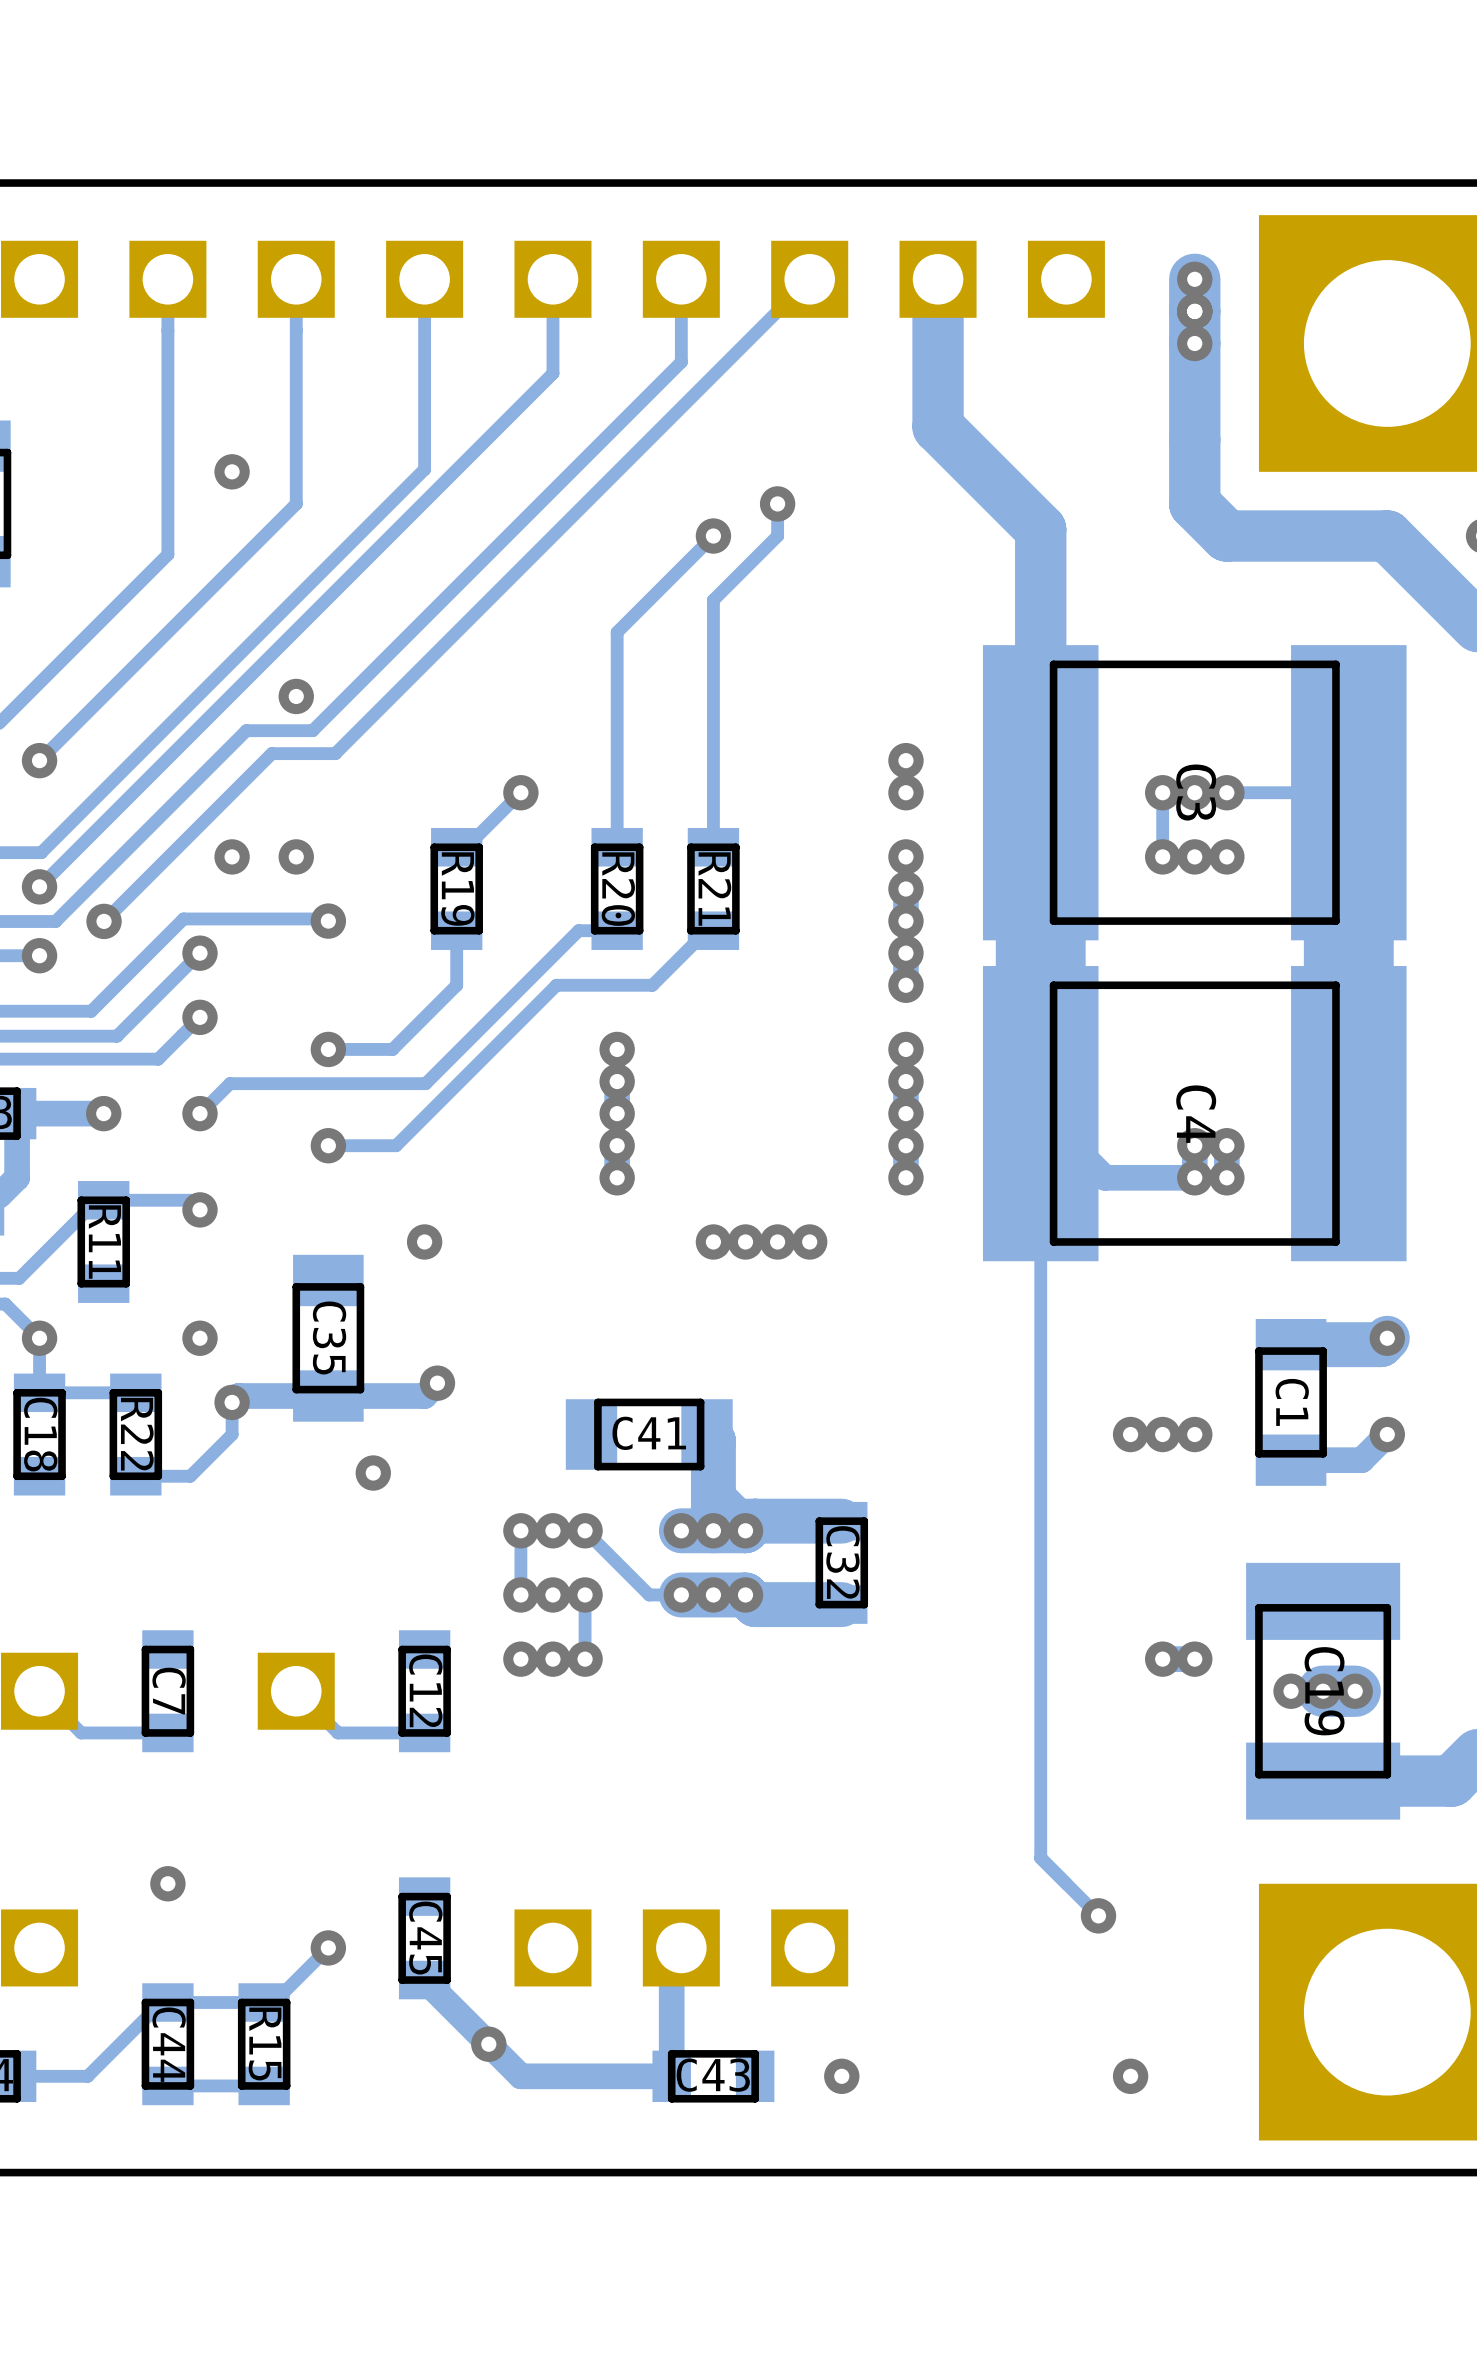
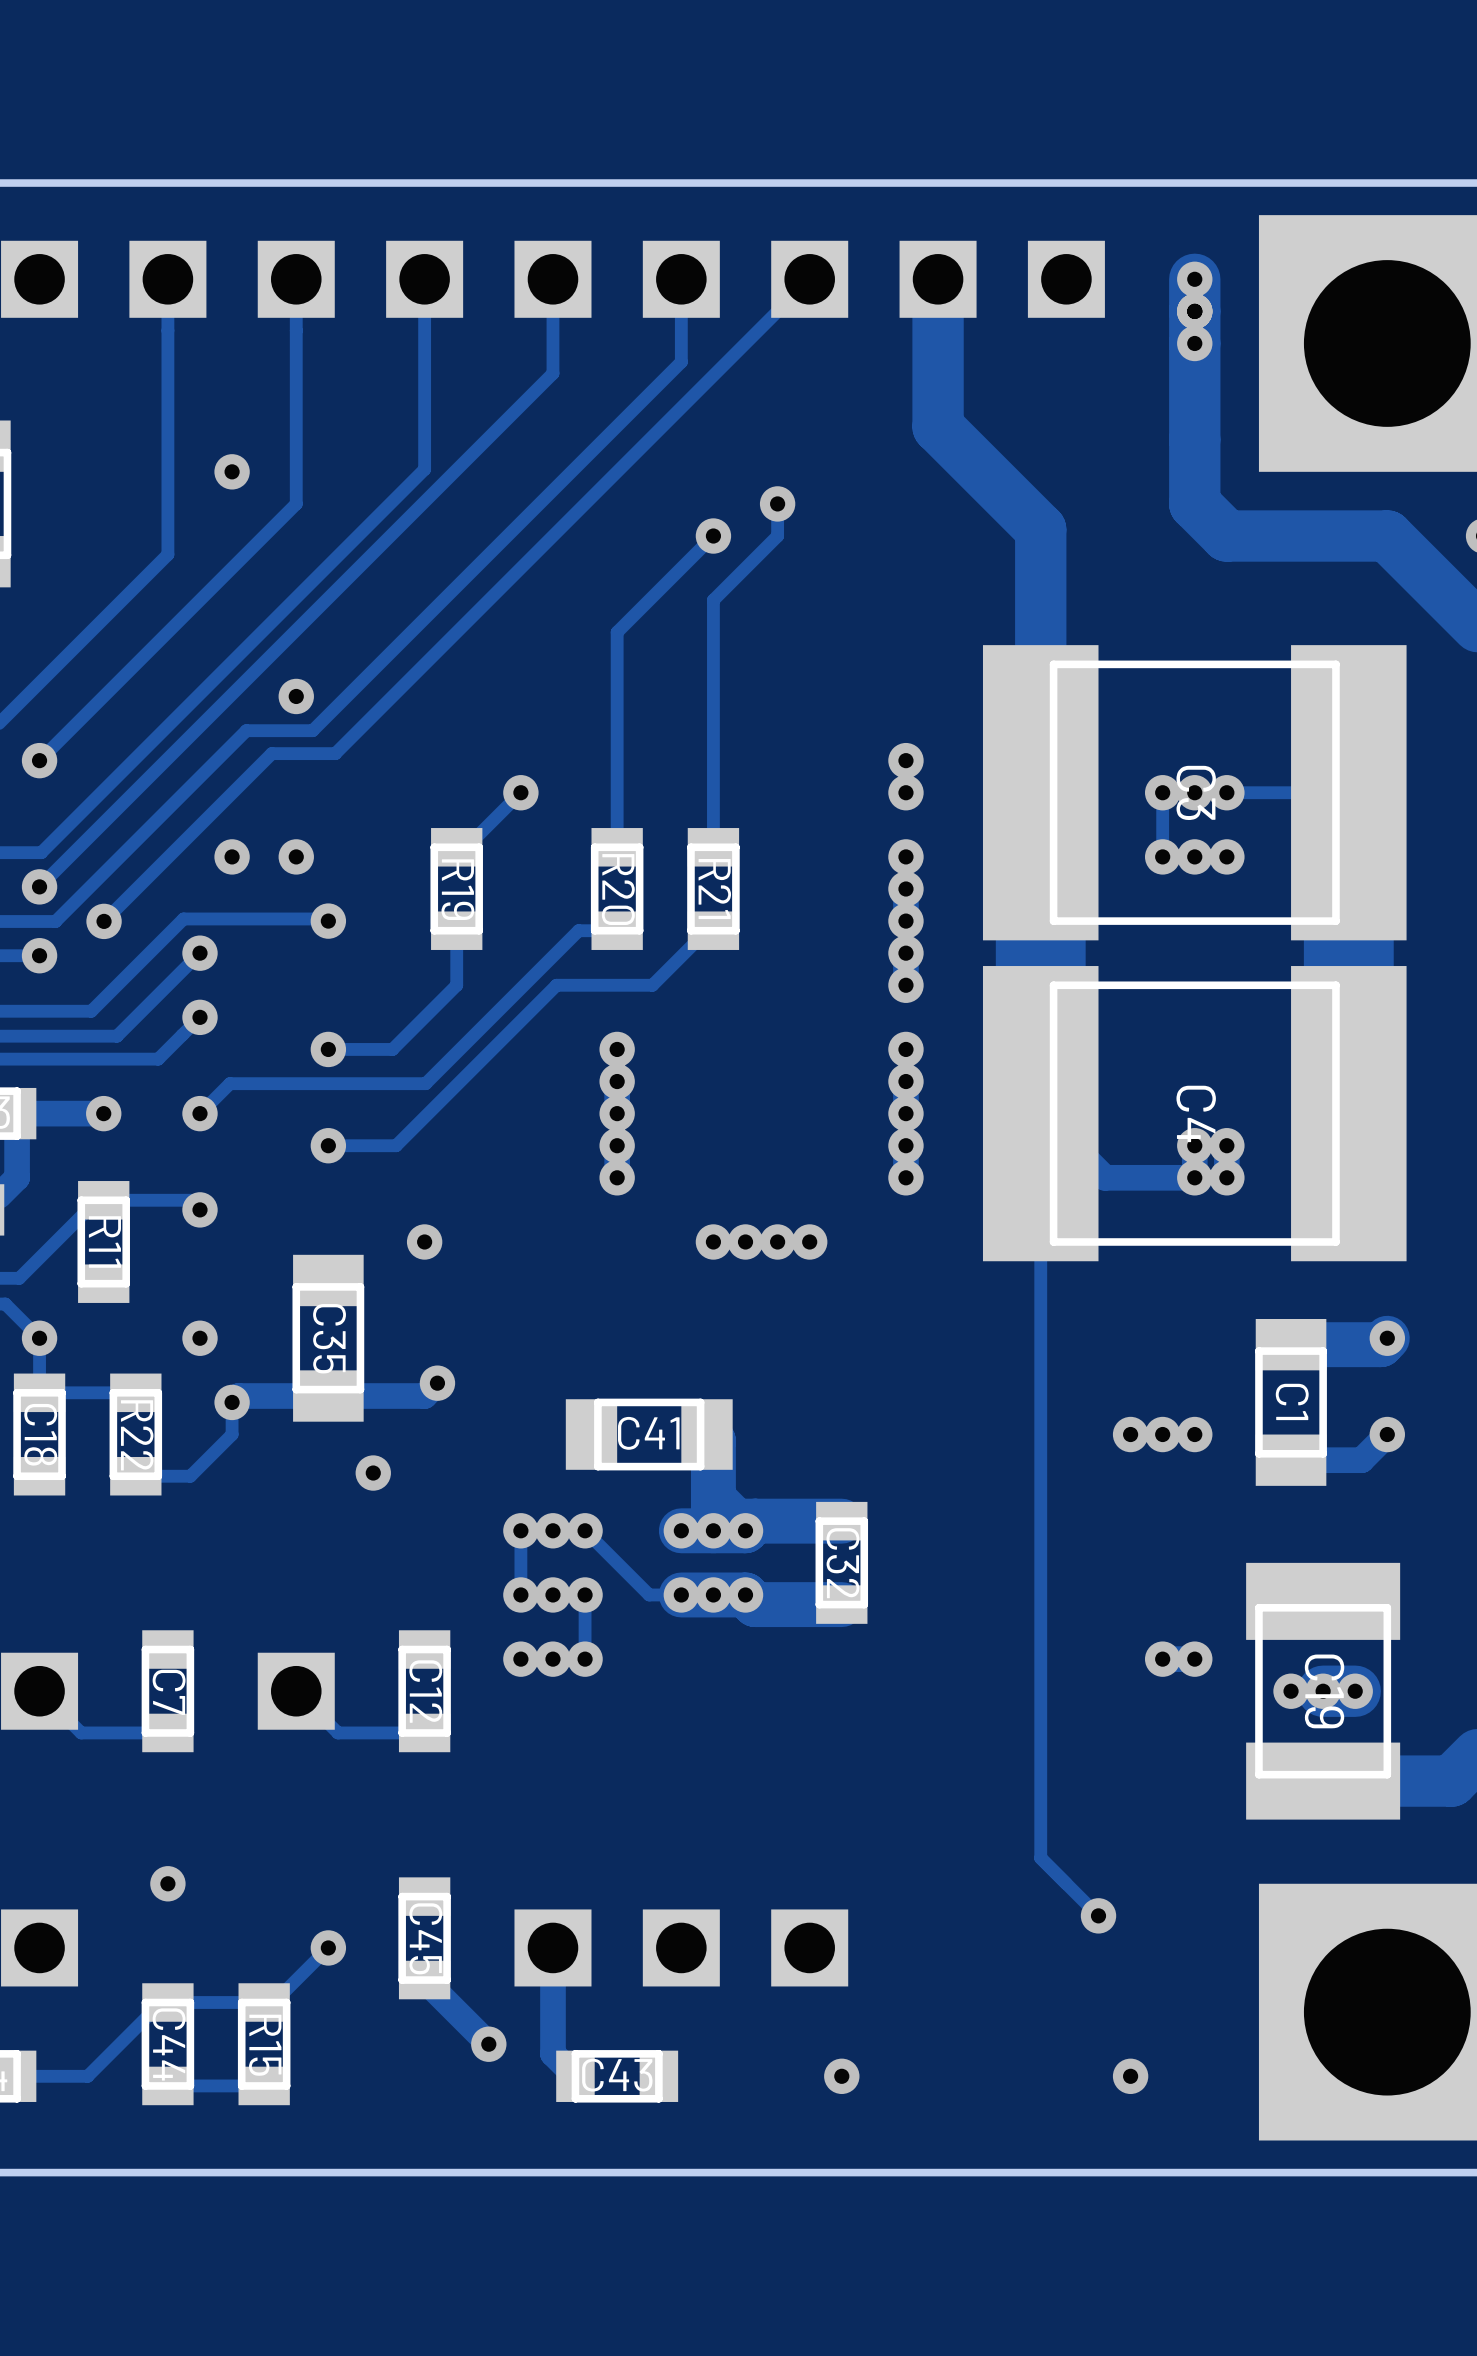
track: none -> (552, 1947) (552, 2053) (575, 2076)
track: (681, 1947) (671, 1957) (671, 2076) (520, 2076) (488, 2044) -> none
C43 position: (713, 2076) -> (617, 2076)

